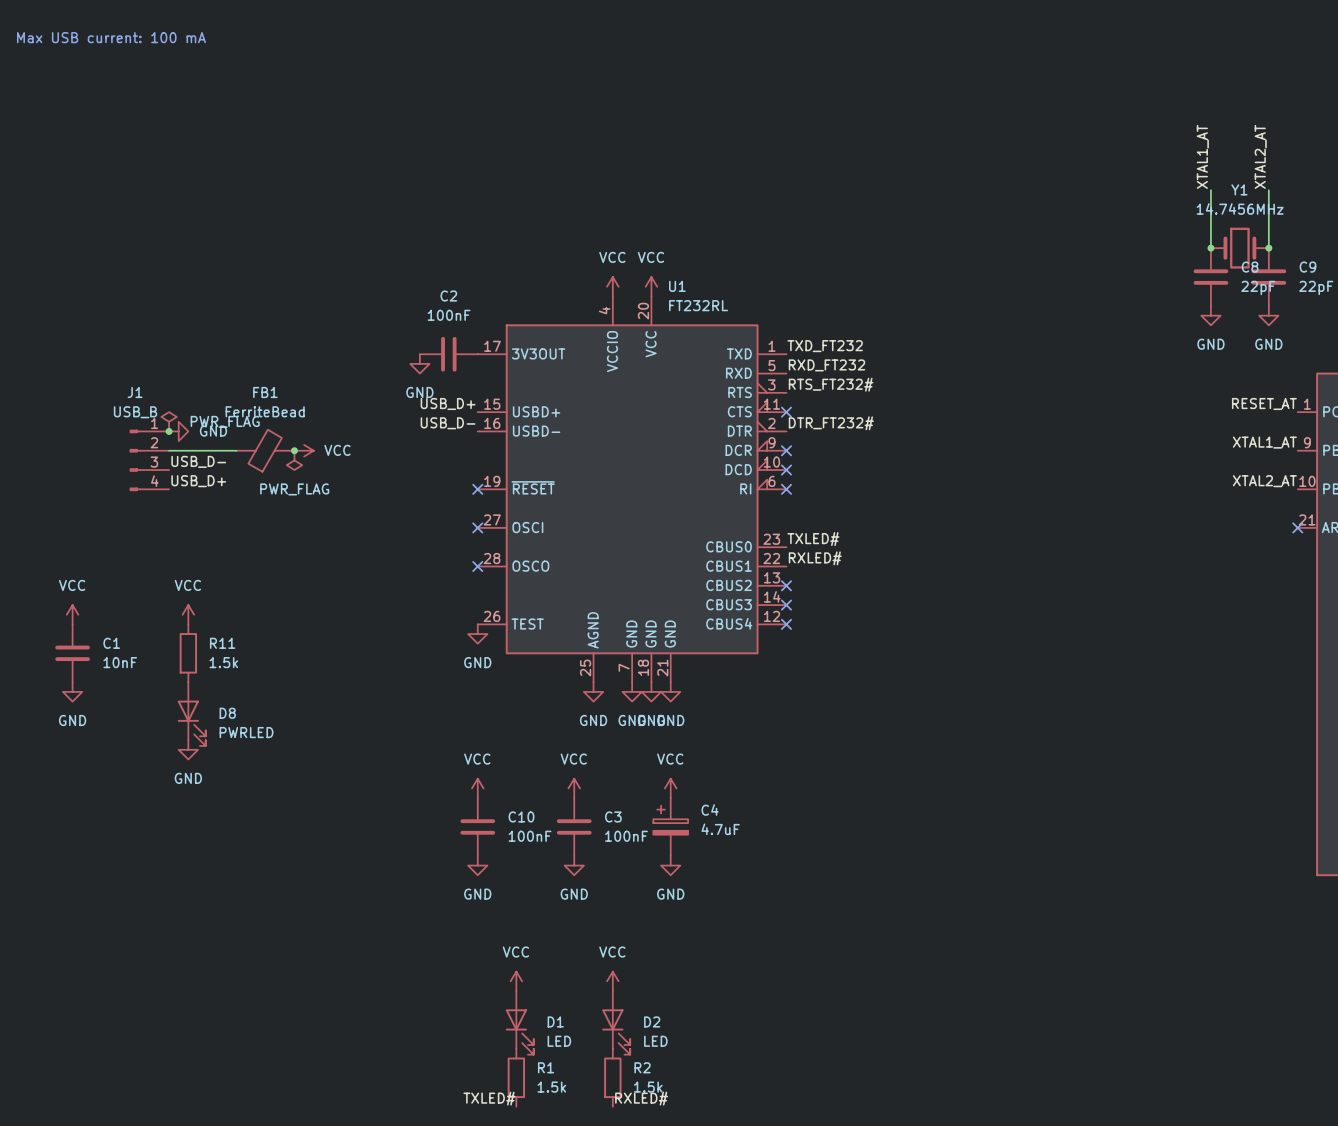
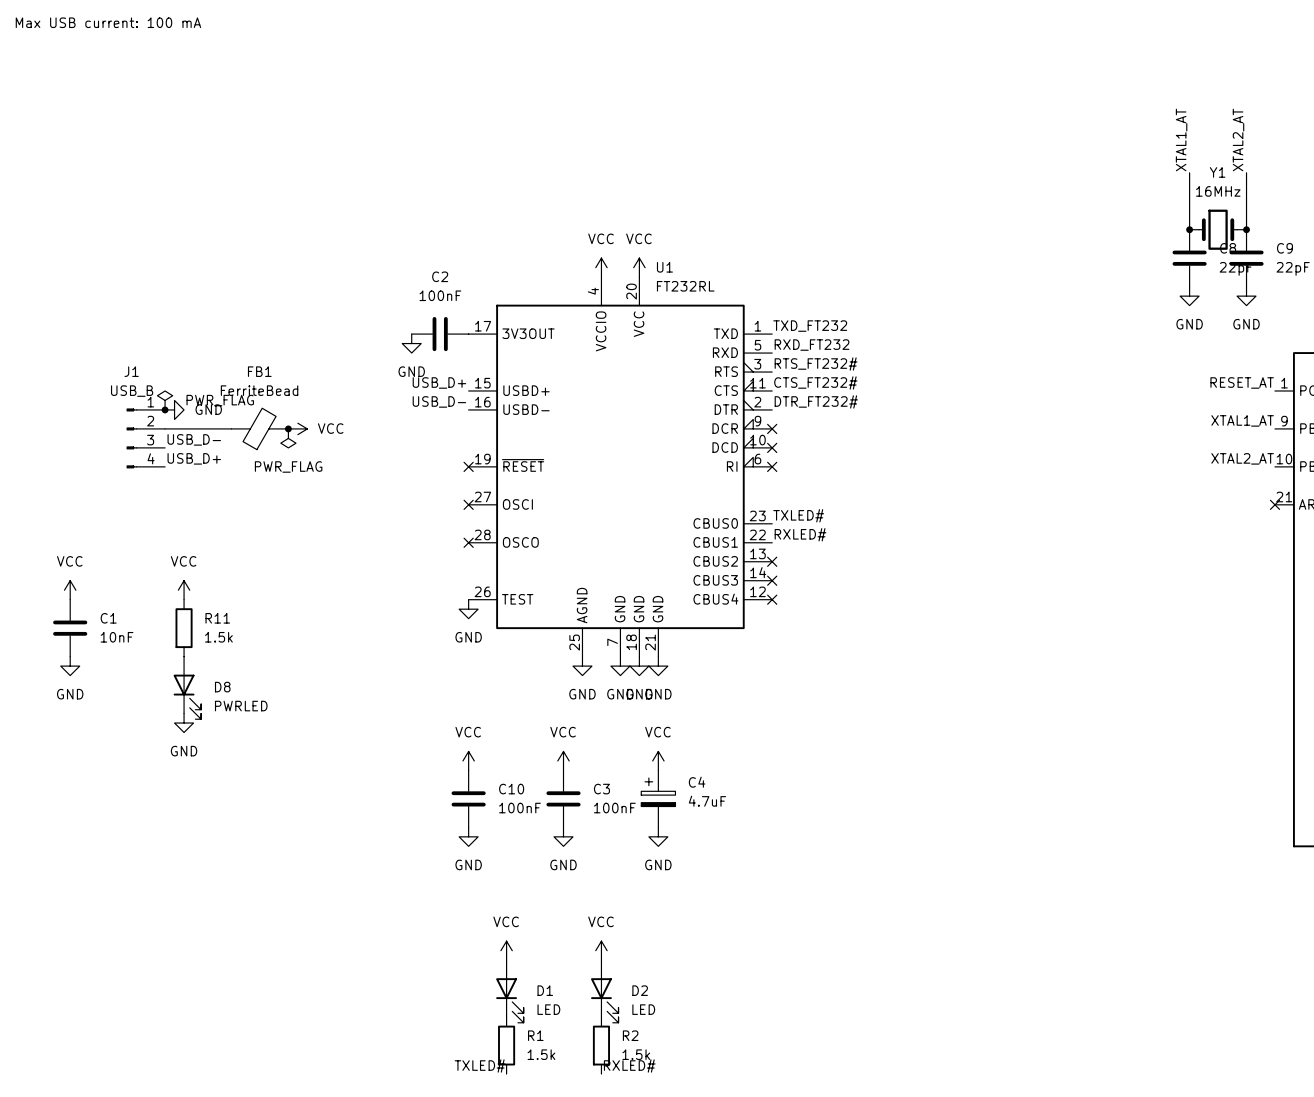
Y1 value: 14.7456MHz (1240, 208) -> 16MHz (1218, 191)
label: none -> CTS_FT232# (815, 382)
no-connect mark: (786, 412) -> none

